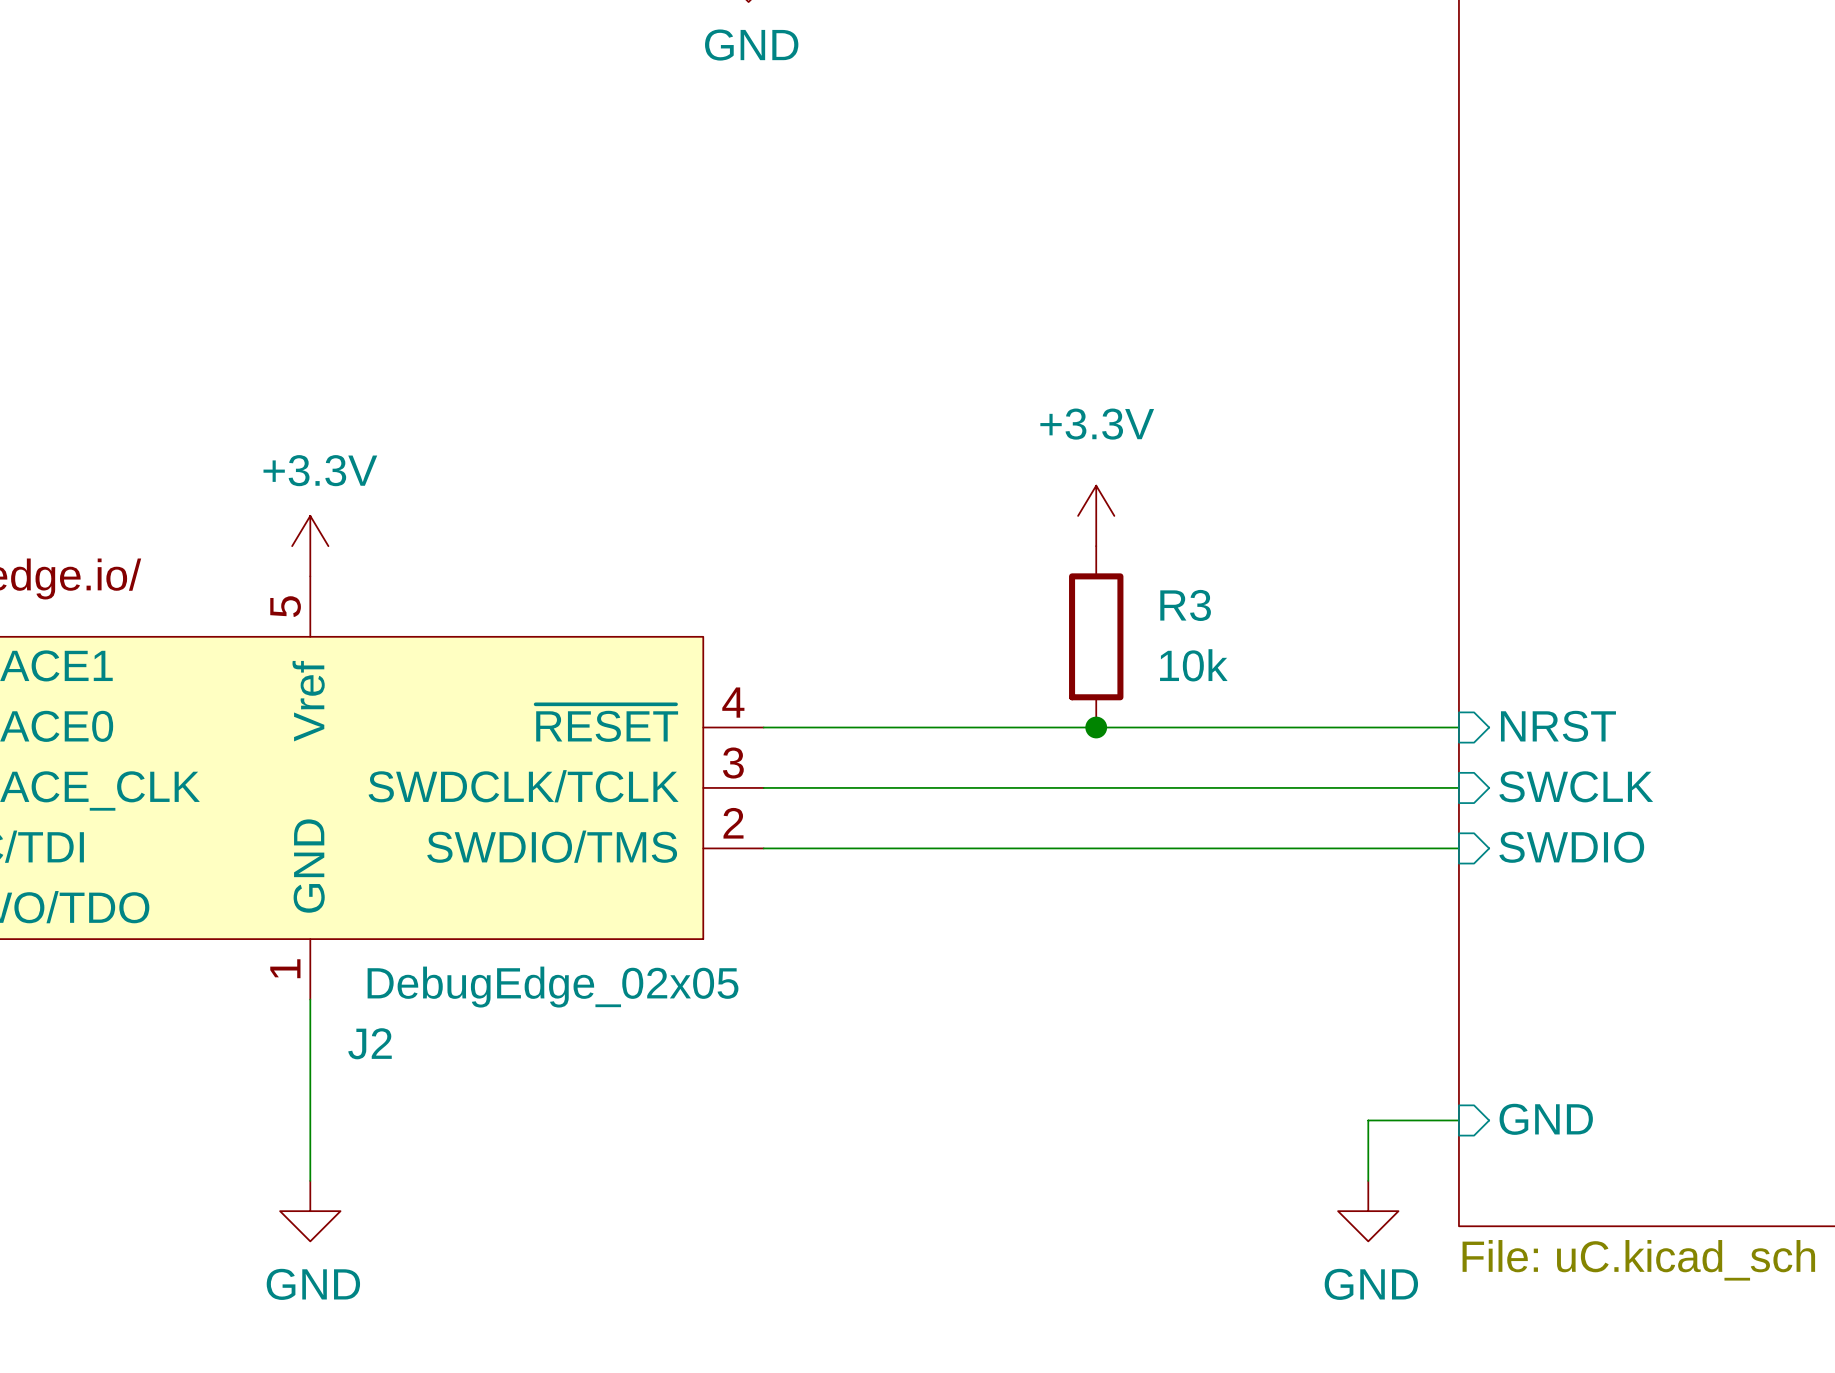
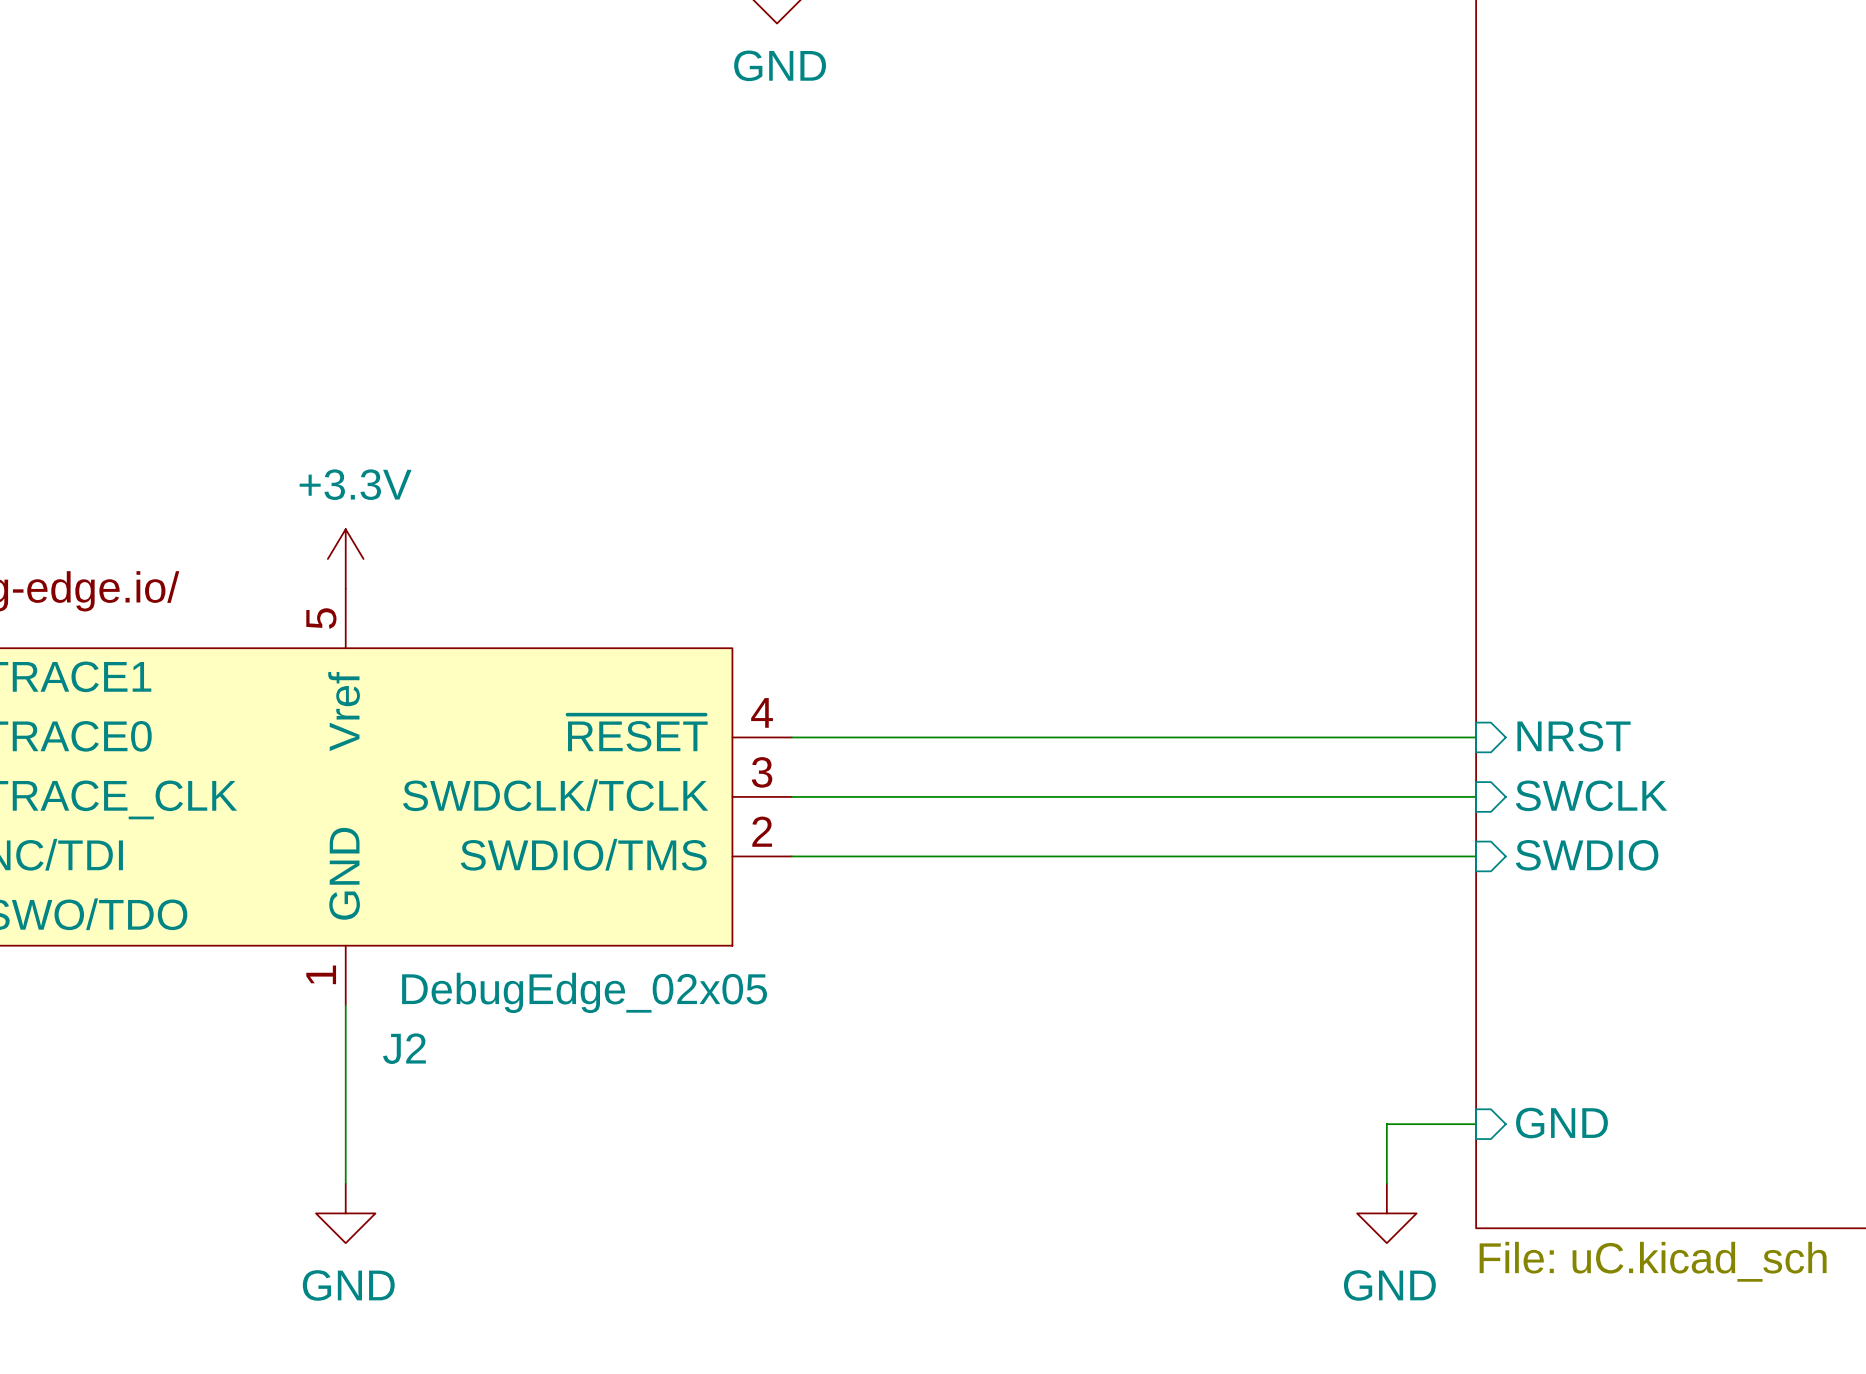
power symbol: +3.3V (1096, 515) -> none
R3: 10k (1096, 636) -> none
junction: (1096, 727) -> none

